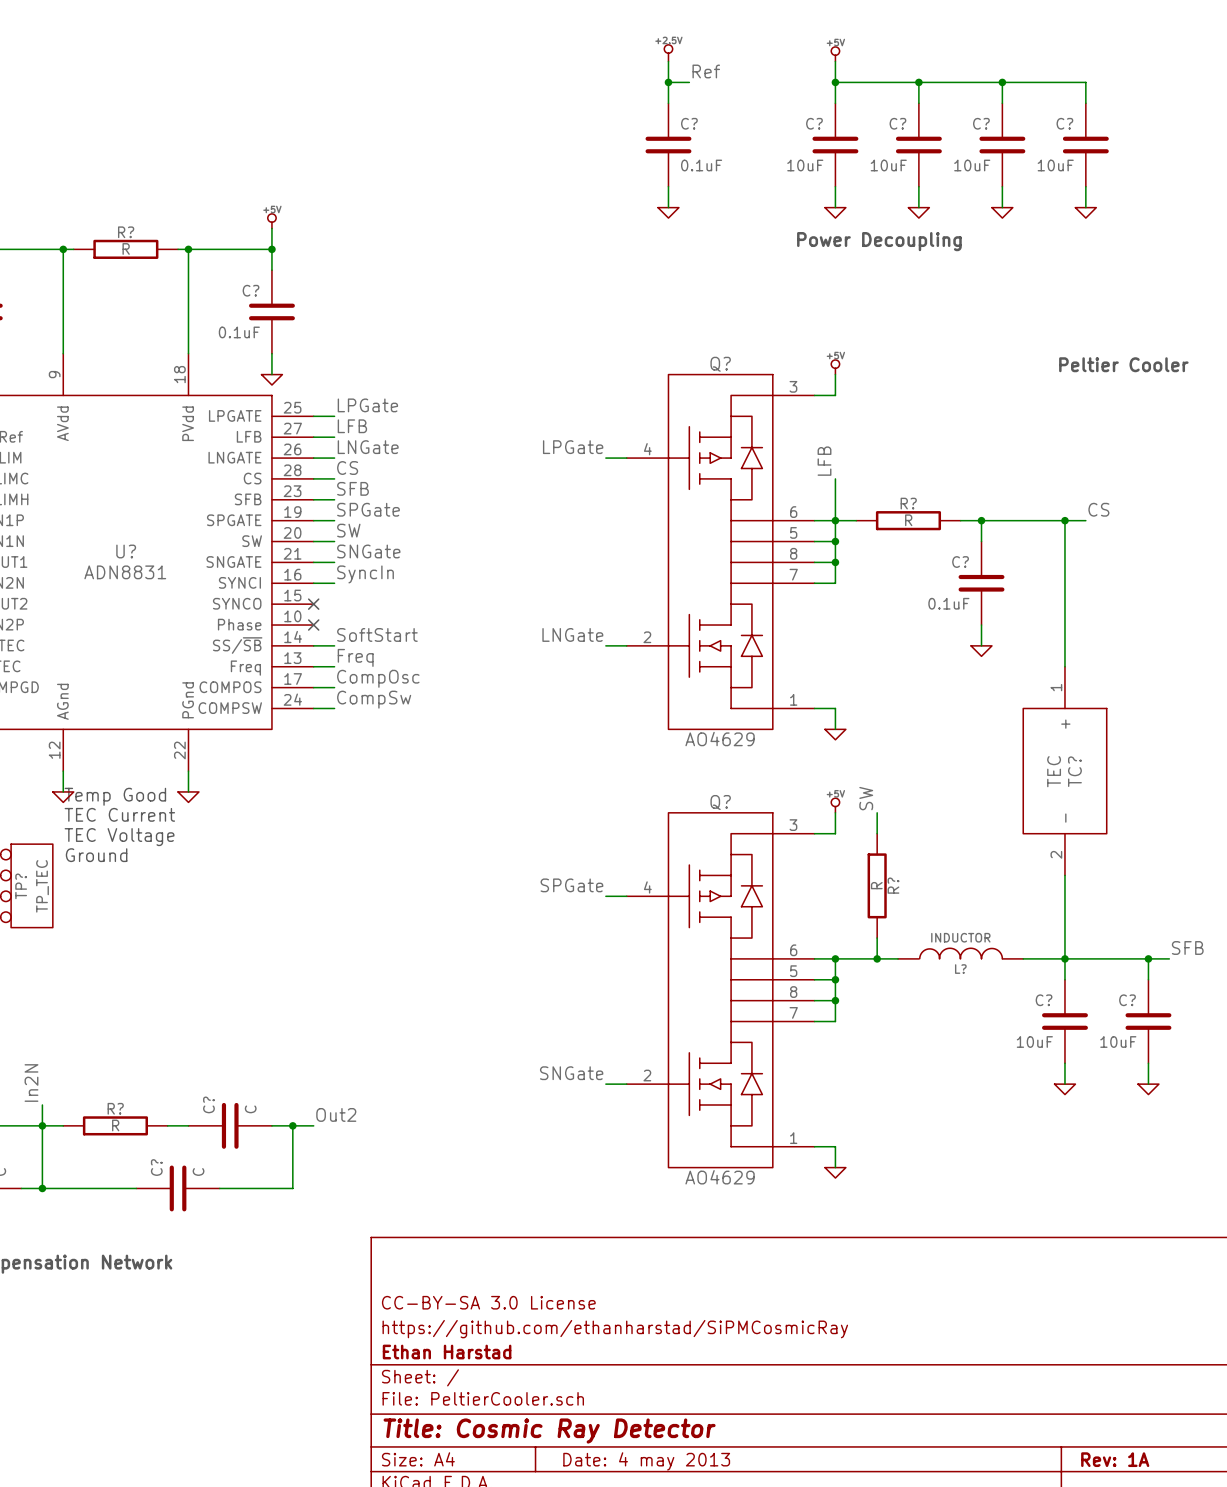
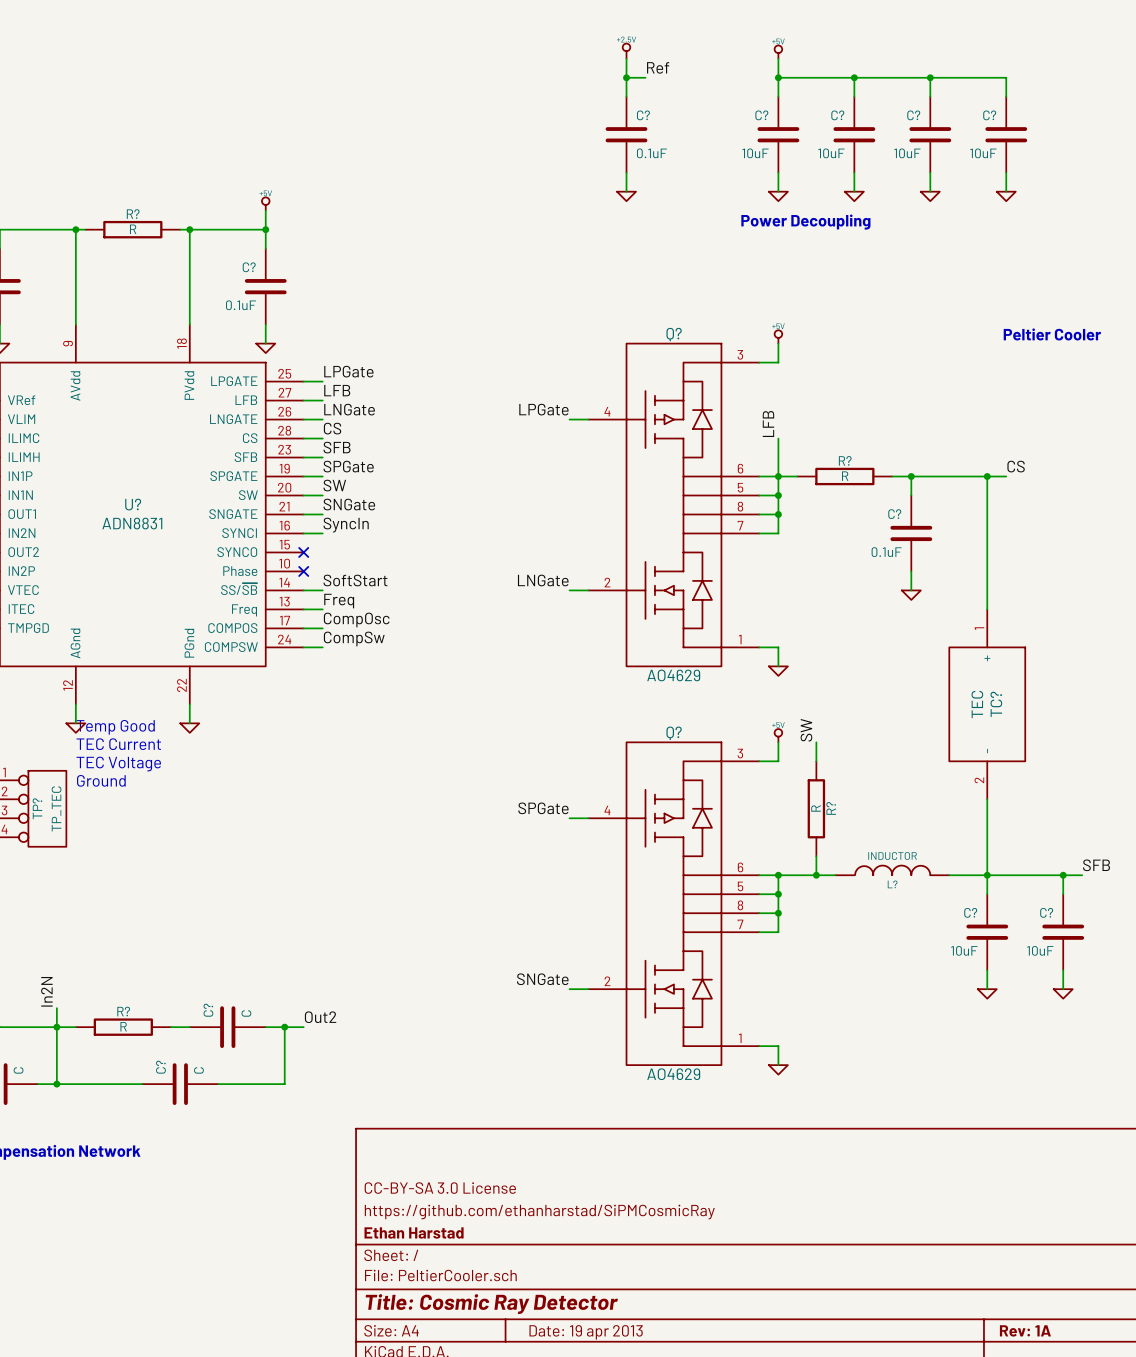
title block: Date: 4 may 2013 (646, 1461) -> Date: 19 apr 2013 (586, 1332)

